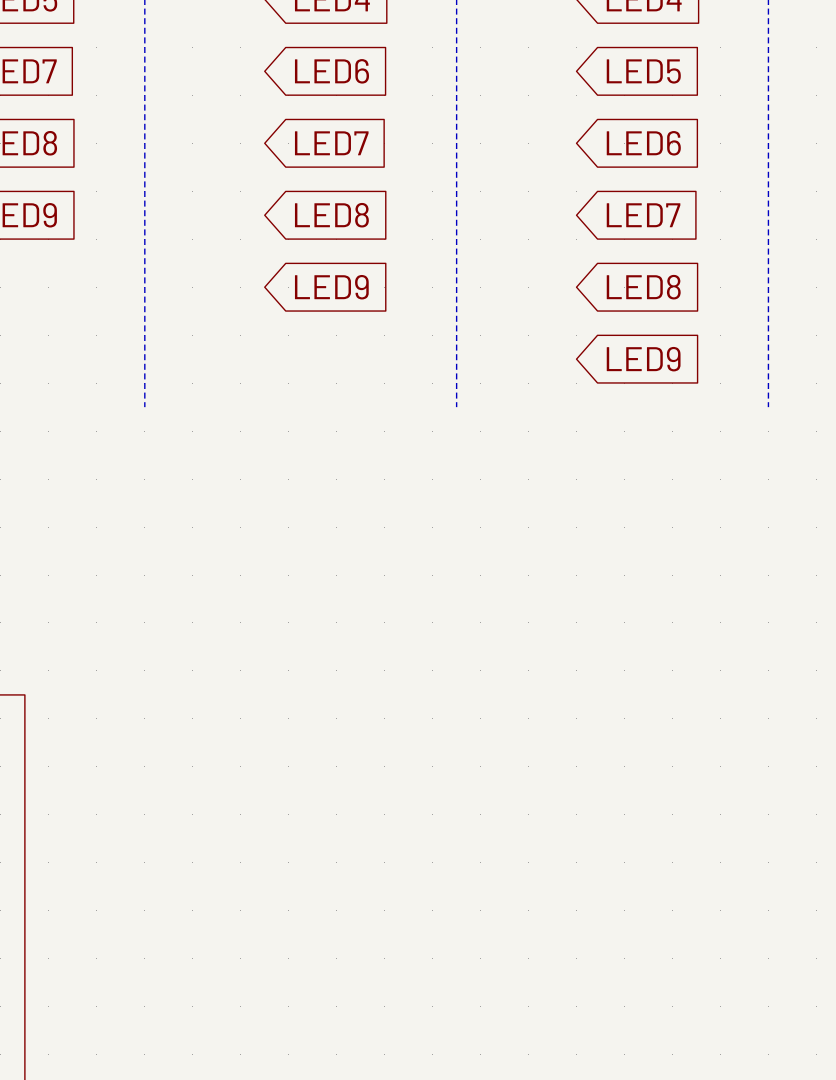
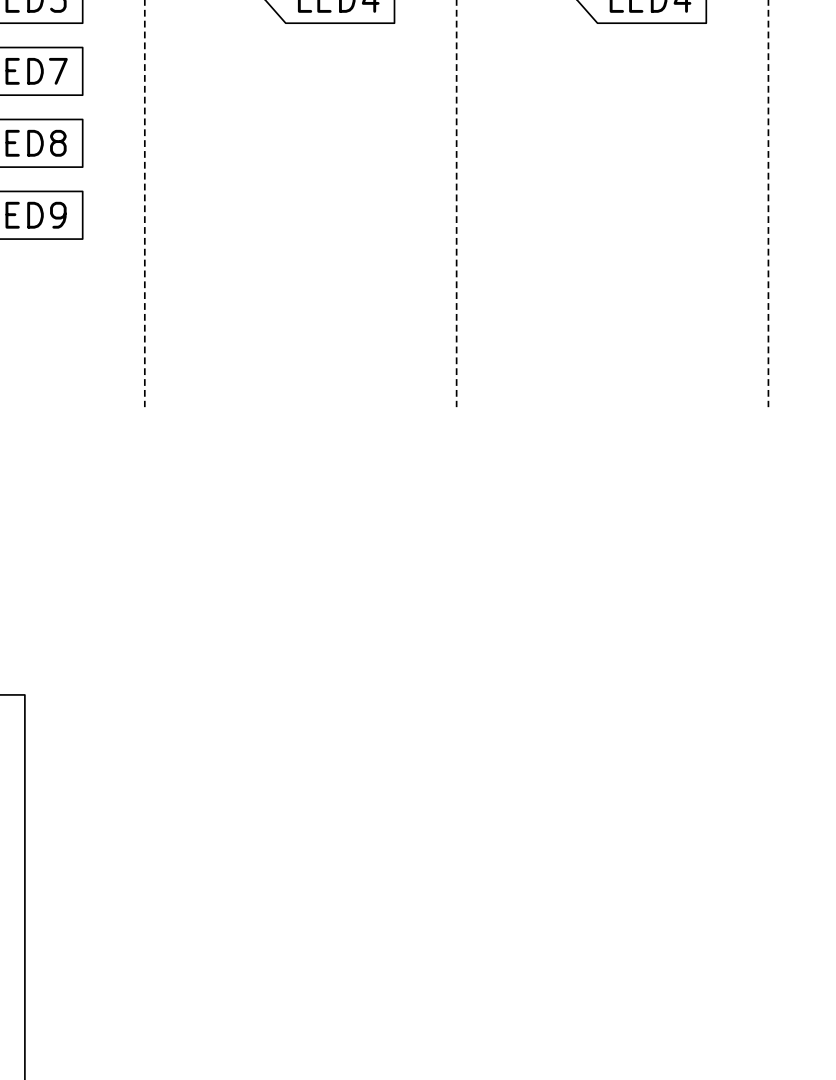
global label: LED6 (331, 71) -> none
global label: LED5 (643, 71) -> none
global label: LED7 (331, 143) -> none
global label: LED6 (643, 143) -> none
global label: LED8 (331, 215) -> none
global label: LED7 (643, 215) -> none
global label: LED9 (331, 287) -> none
global label: LED8 (643, 287) -> none
global label: LED9 (643, 359) -> none

